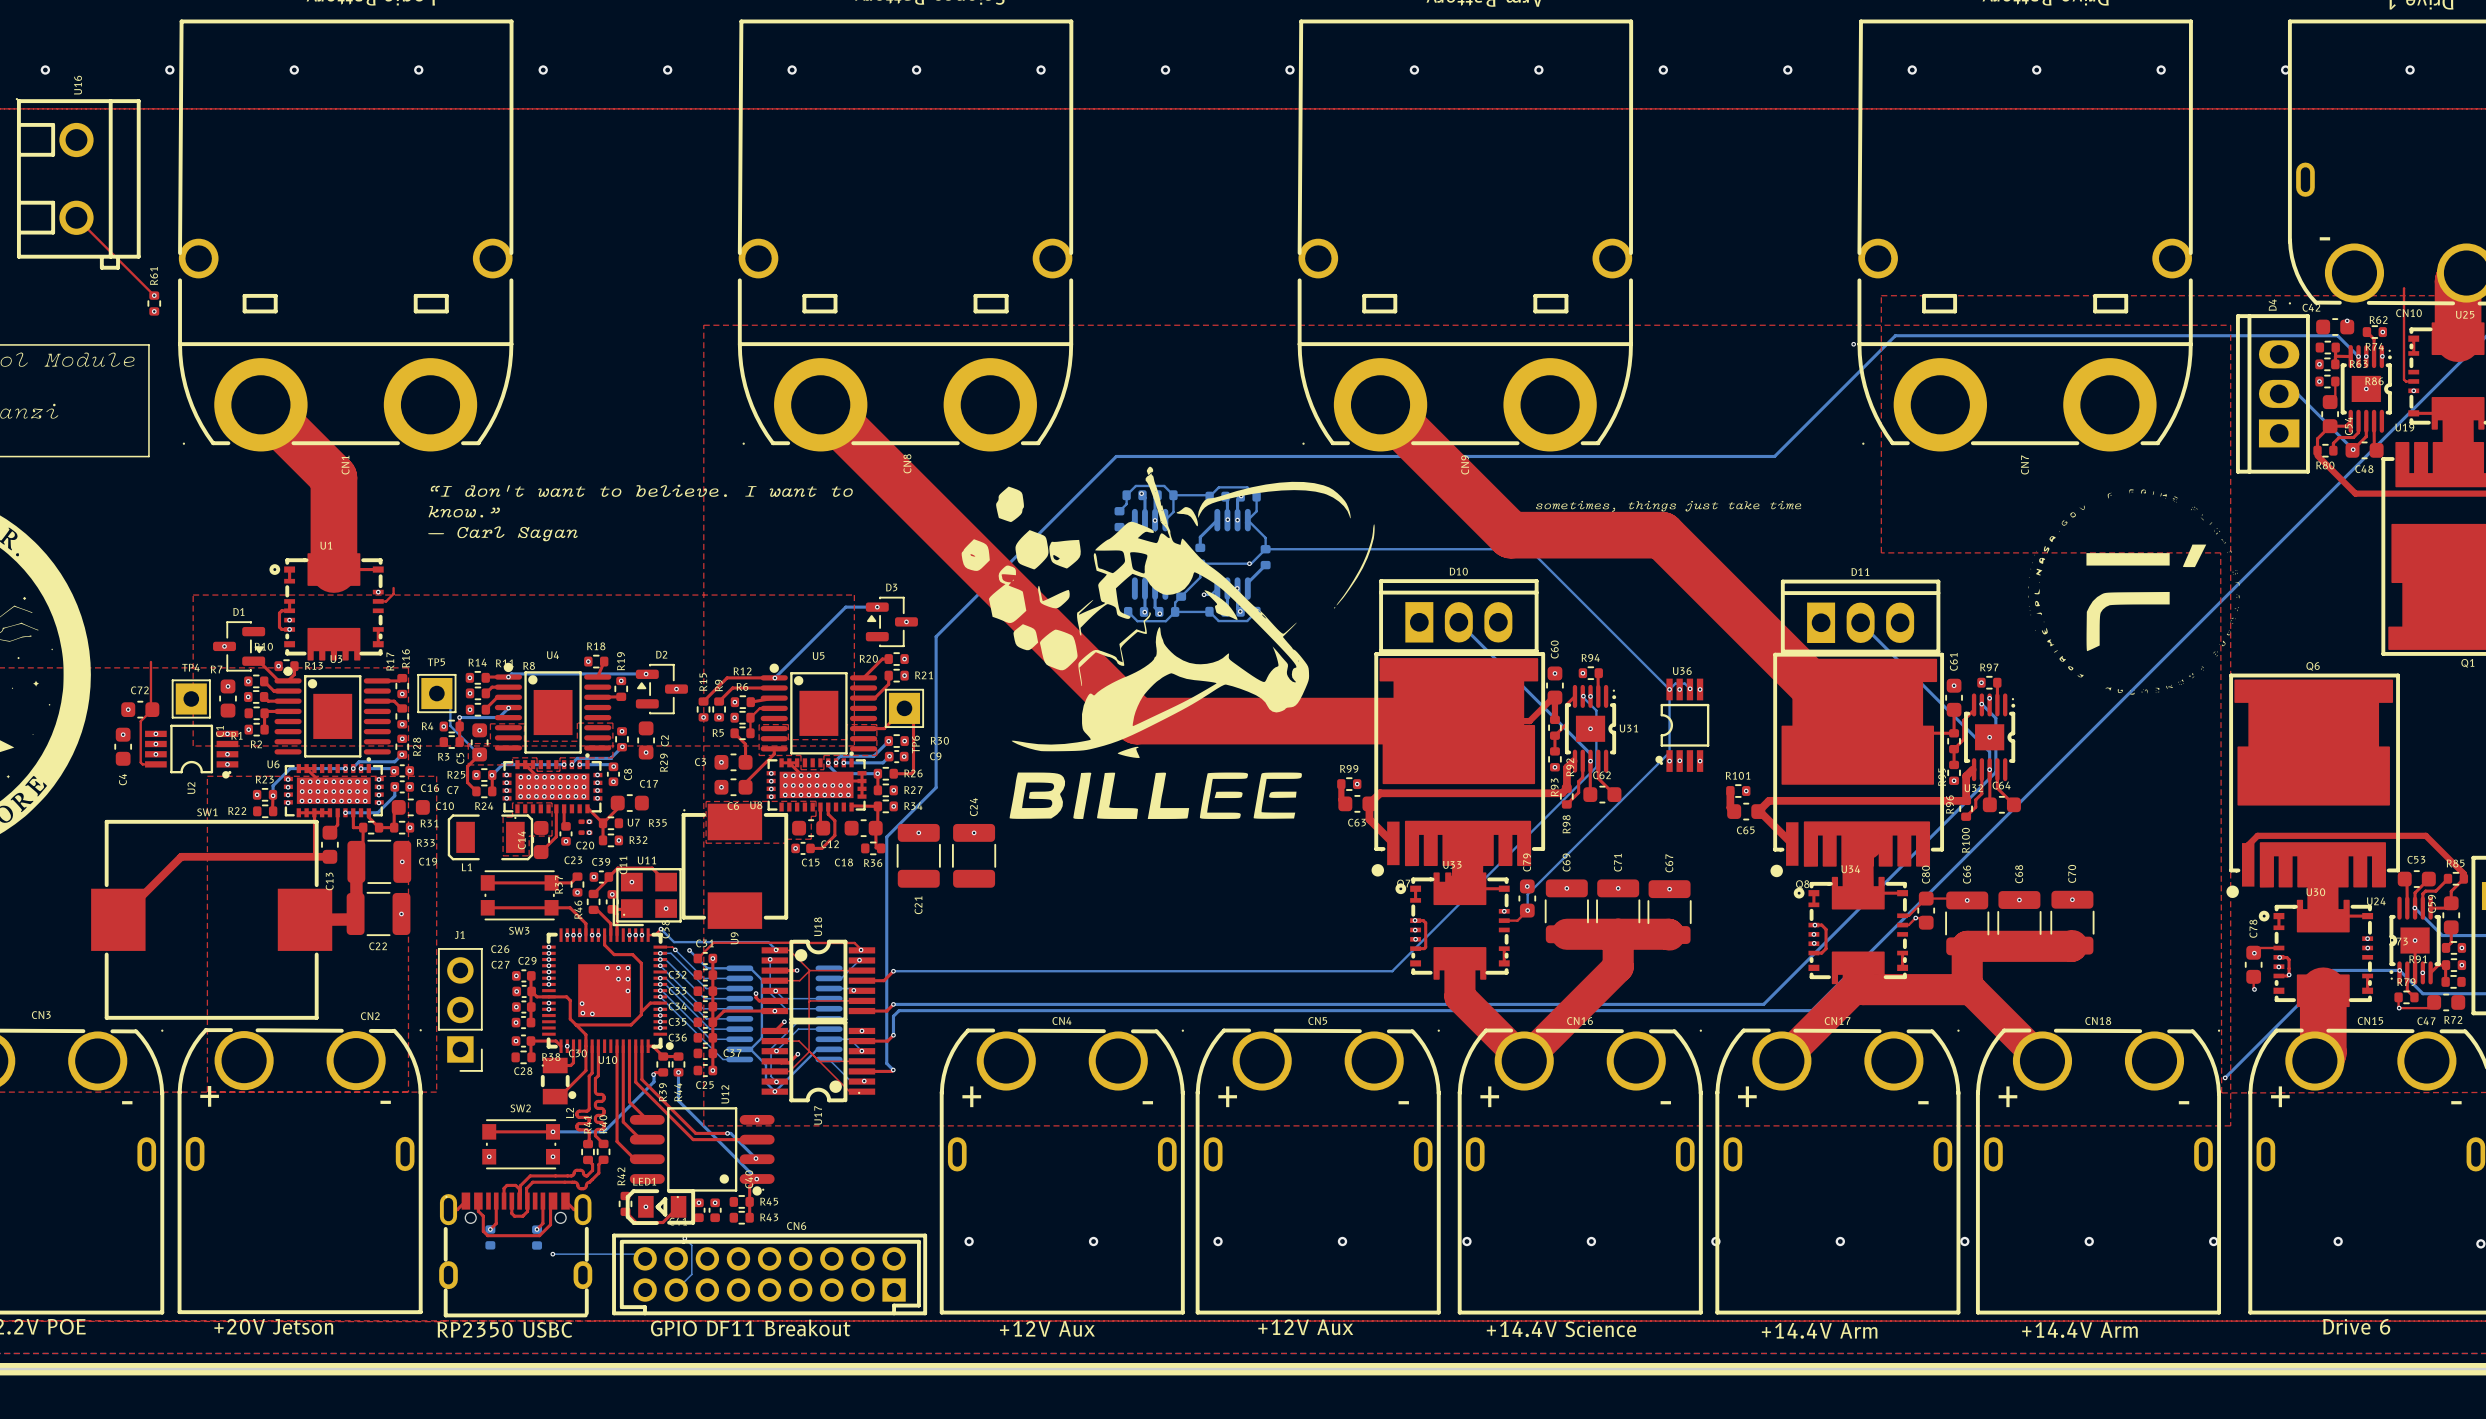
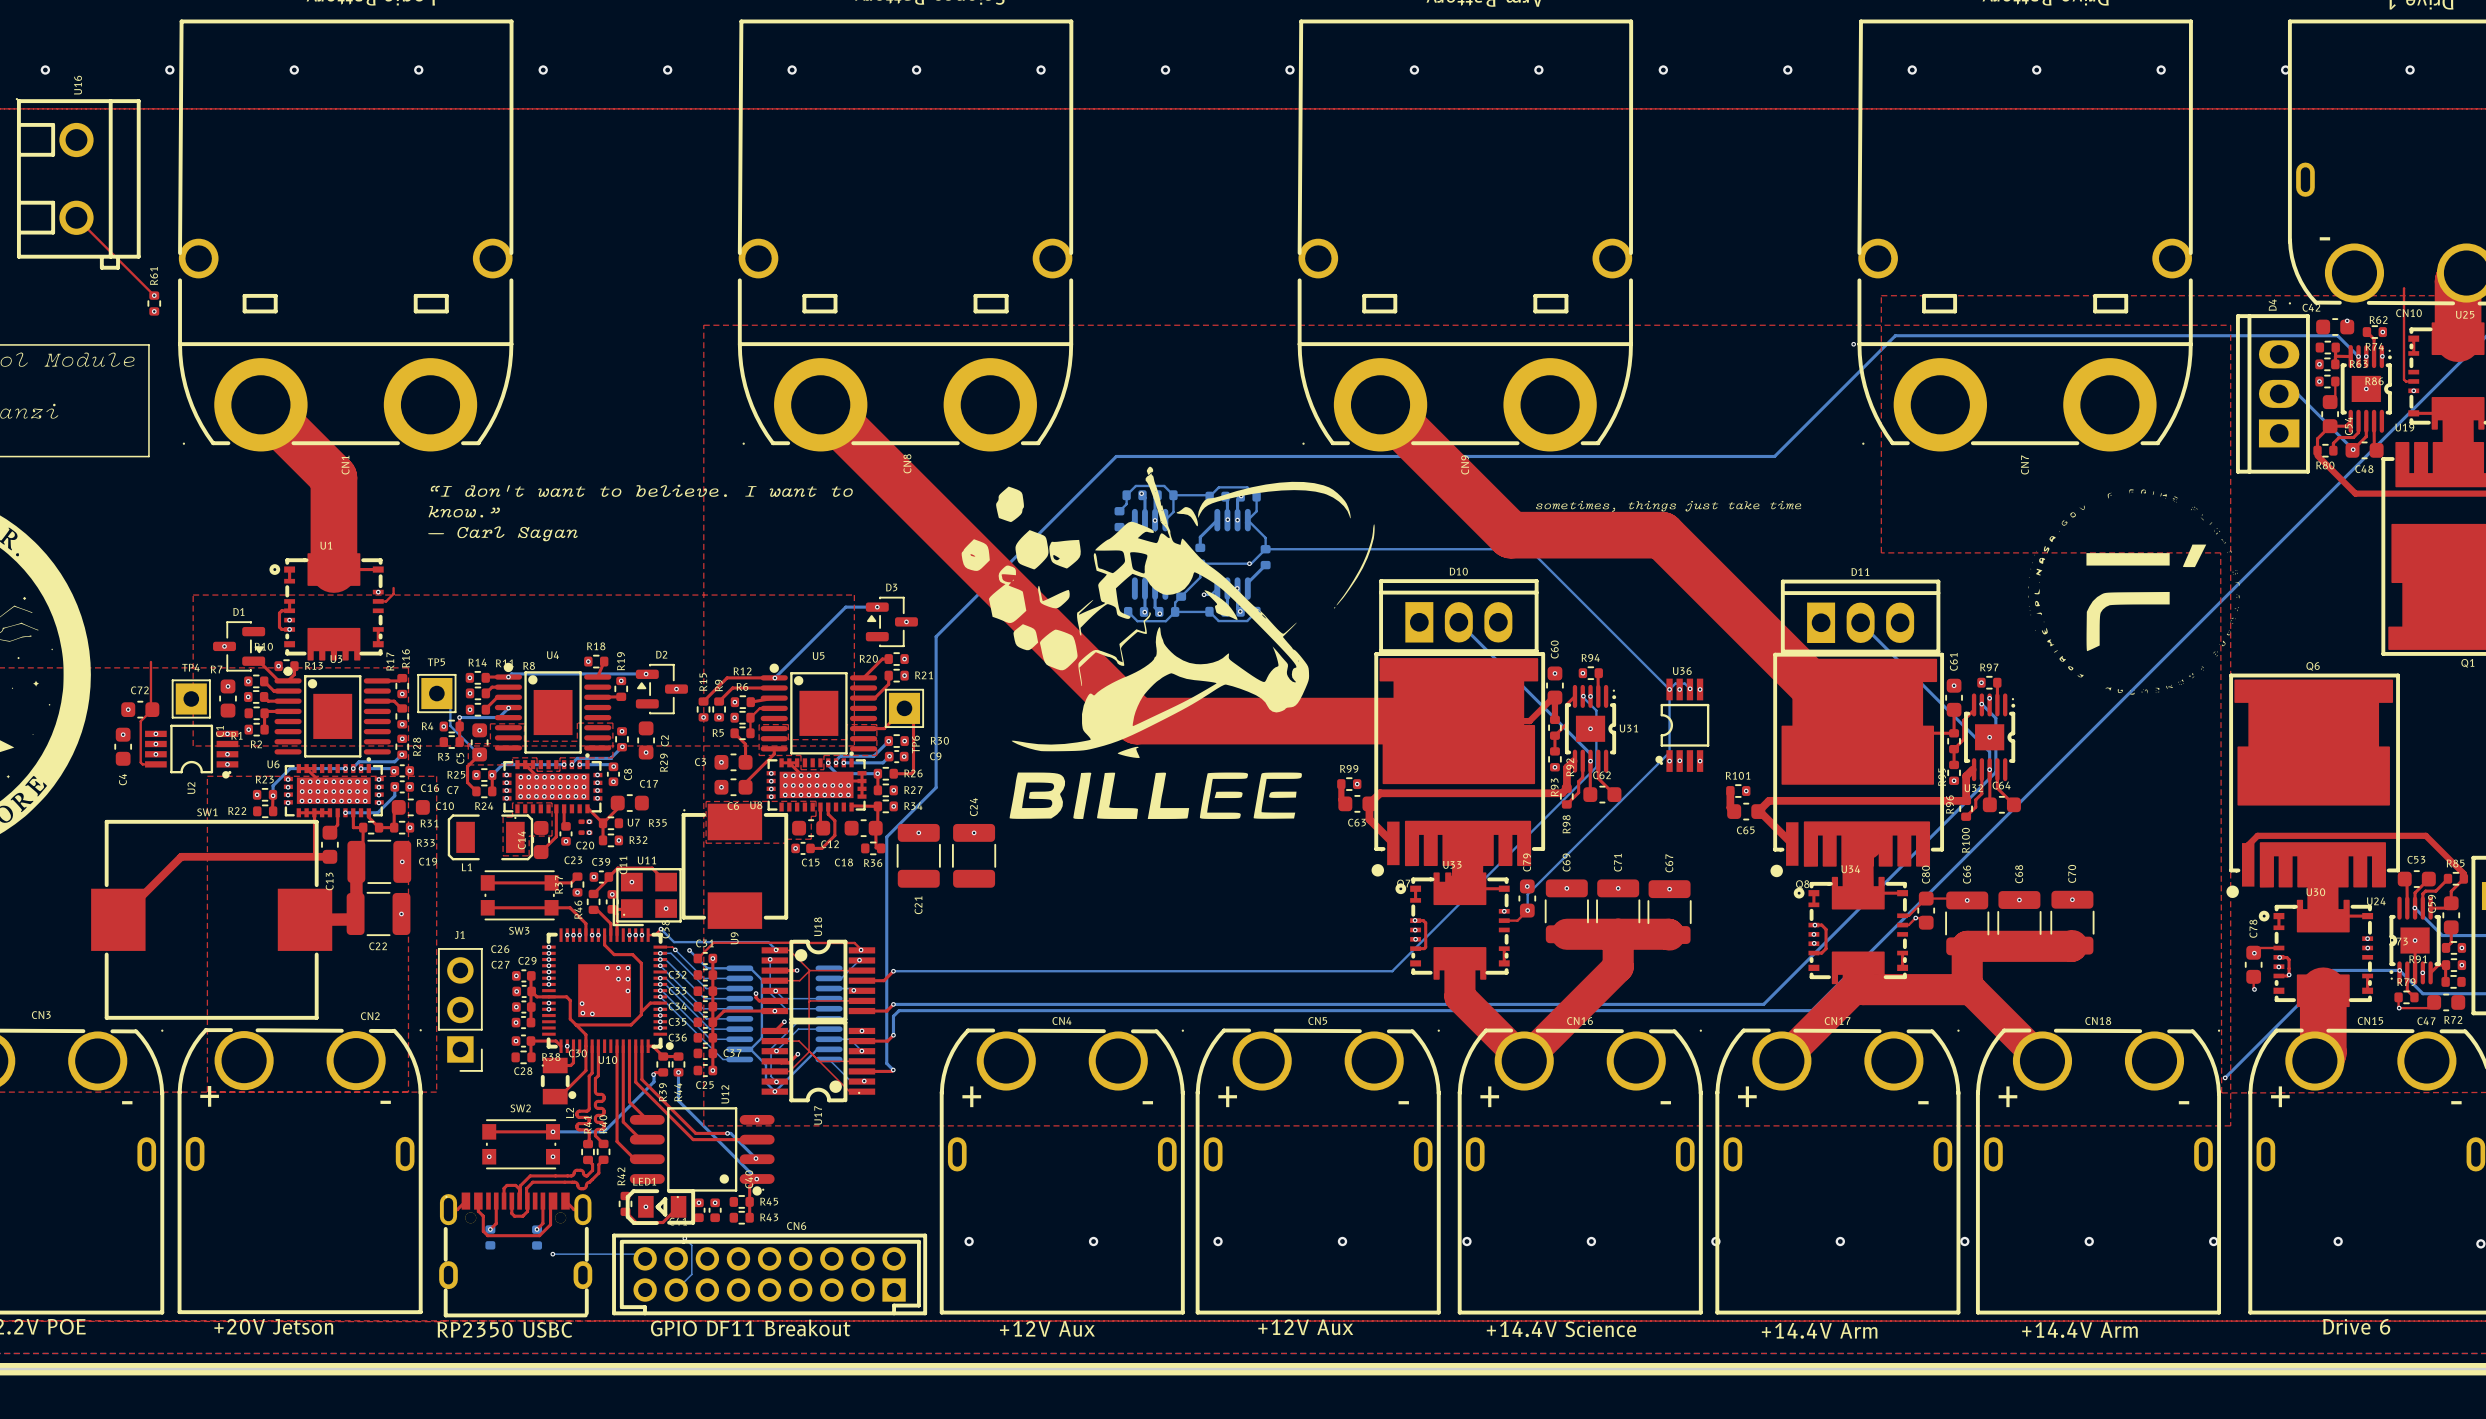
part footprint: [439, 1192, 593, 1318] -> [439, 1192, 593, 1318]

